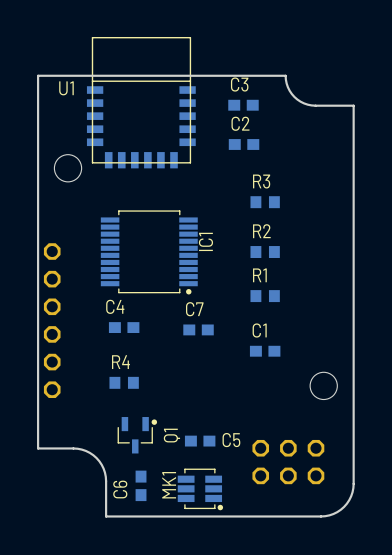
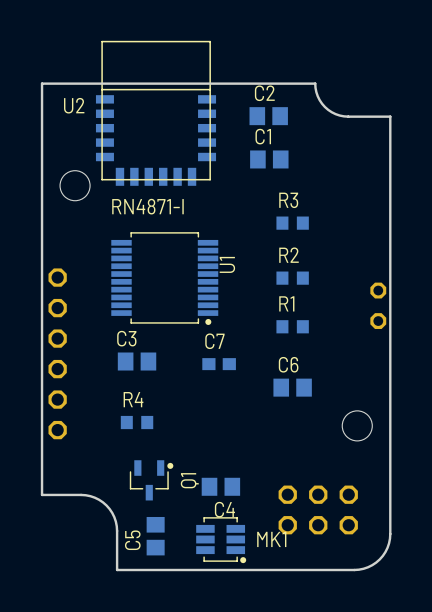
U1 name: U1 (66, 88) -> U2 (74, 105)
C3 footprint: [228, 99, 259, 111] -> [117, 352, 157, 371]
C2 footprint: [228, 139, 260, 150] -> [249, 107, 288, 126]
U1 value: none -> RN4871-I (147, 206)
IC1 name: IC1 (205, 241) -> U1 (227, 264)
part: none -> (378, 305)
C4 name position: C4 (115, 306) -> C4 (224, 509)
C4 footprint: [108, 322, 140, 334] -> [201, 477, 241, 496]
C1 footprint: [249, 345, 281, 357] -> [250, 150, 289, 169]
C5 footprint: [184, 435, 216, 447] -> [146, 516, 165, 556]
C5 name position: C5 (231, 440) -> C5 (132, 540)
C6 footprint: [135, 470, 147, 502] -> [273, 378, 312, 397]
MK1 name rotation: 0° (169, 485) -> 90° clockwise (271, 539)
MK1 name position: MK1 (169, 485) -> MK1 (271, 539)
C6 name position: C6 (120, 489) -> C6 (288, 364)

